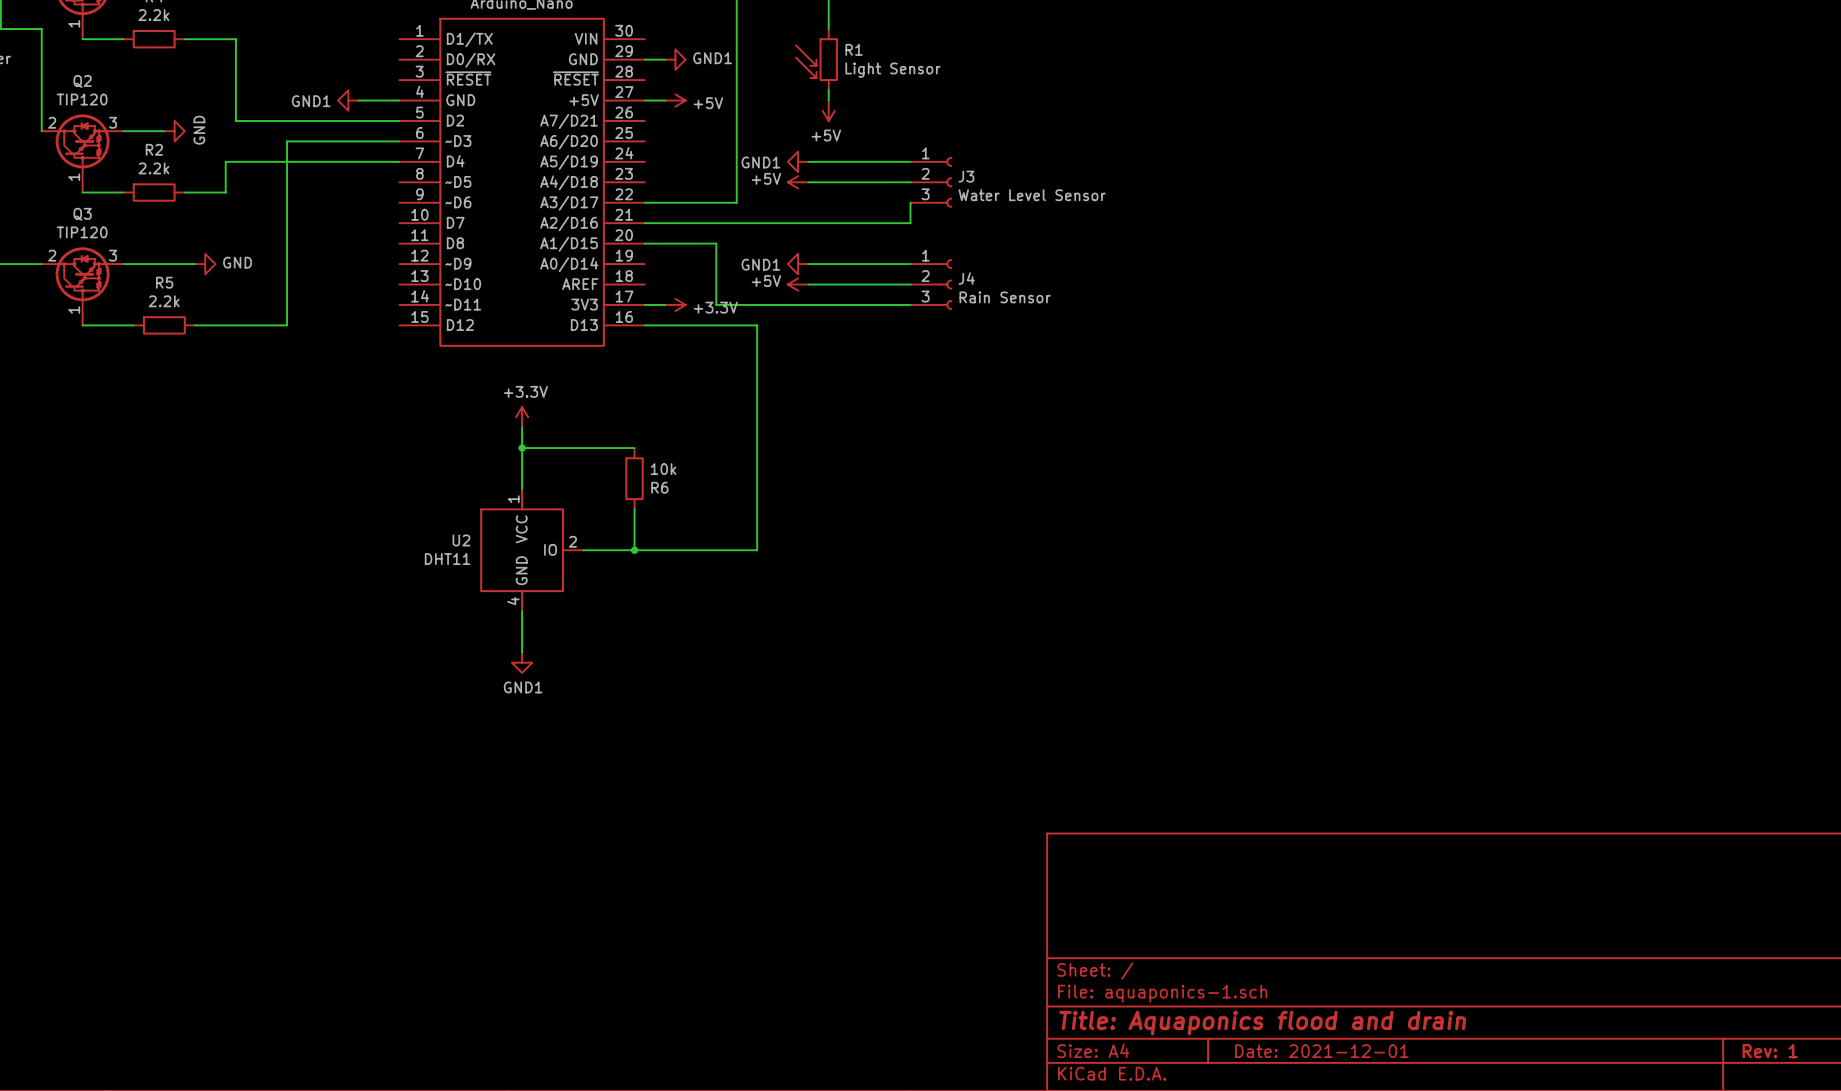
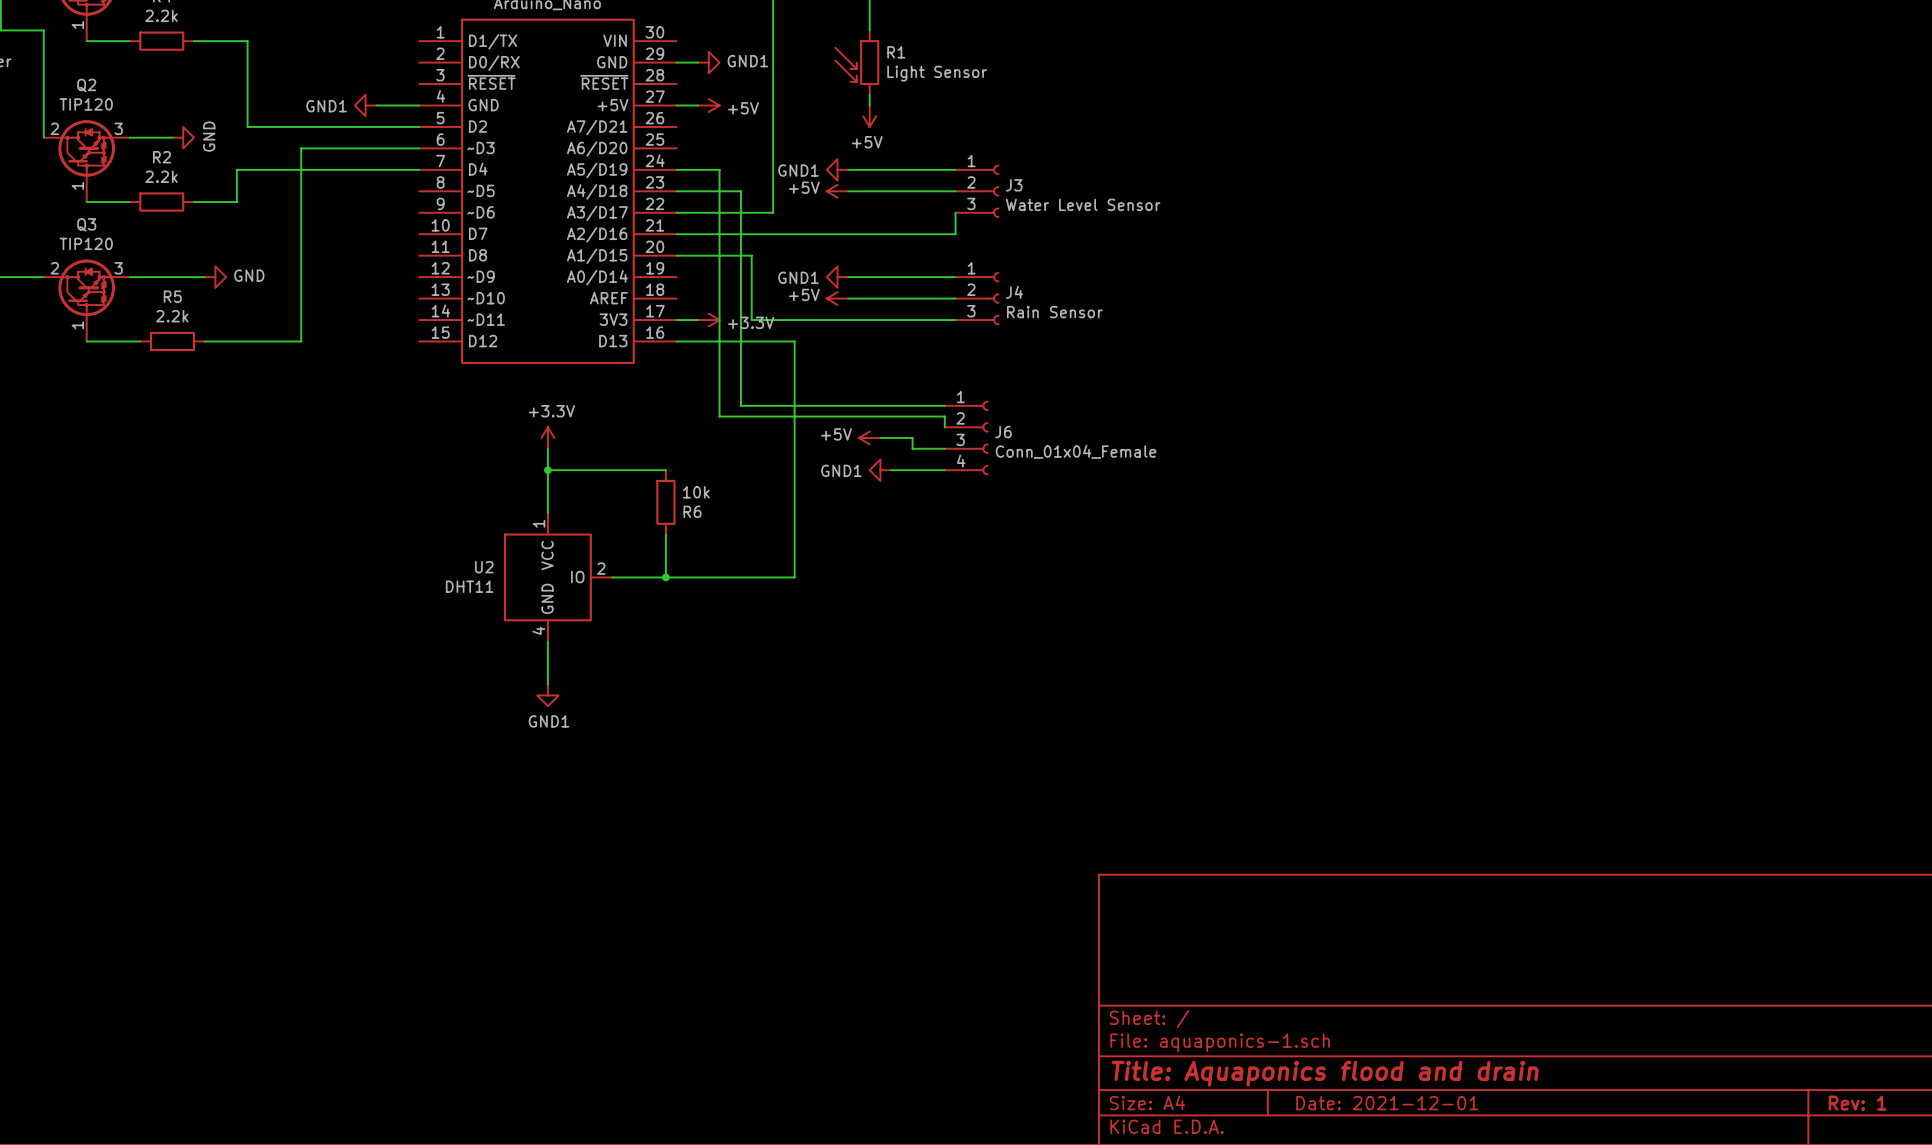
wire: none -> (676, 169) (719, 169) (719, 416) (944, 416) (944, 427)
wire: none -> (676, 191) (740, 191) (740, 405) (944, 405)
power symbol: none -> +5V (869, 438)
wire: none -> (880, 438) (912, 438) (912, 448) (944, 448)
J6: none -> Conn_01x04_Female (966, 438)
power symbol: none -> GND1 (880, 470)
wire: none -> (891, 470) (944, 470)

